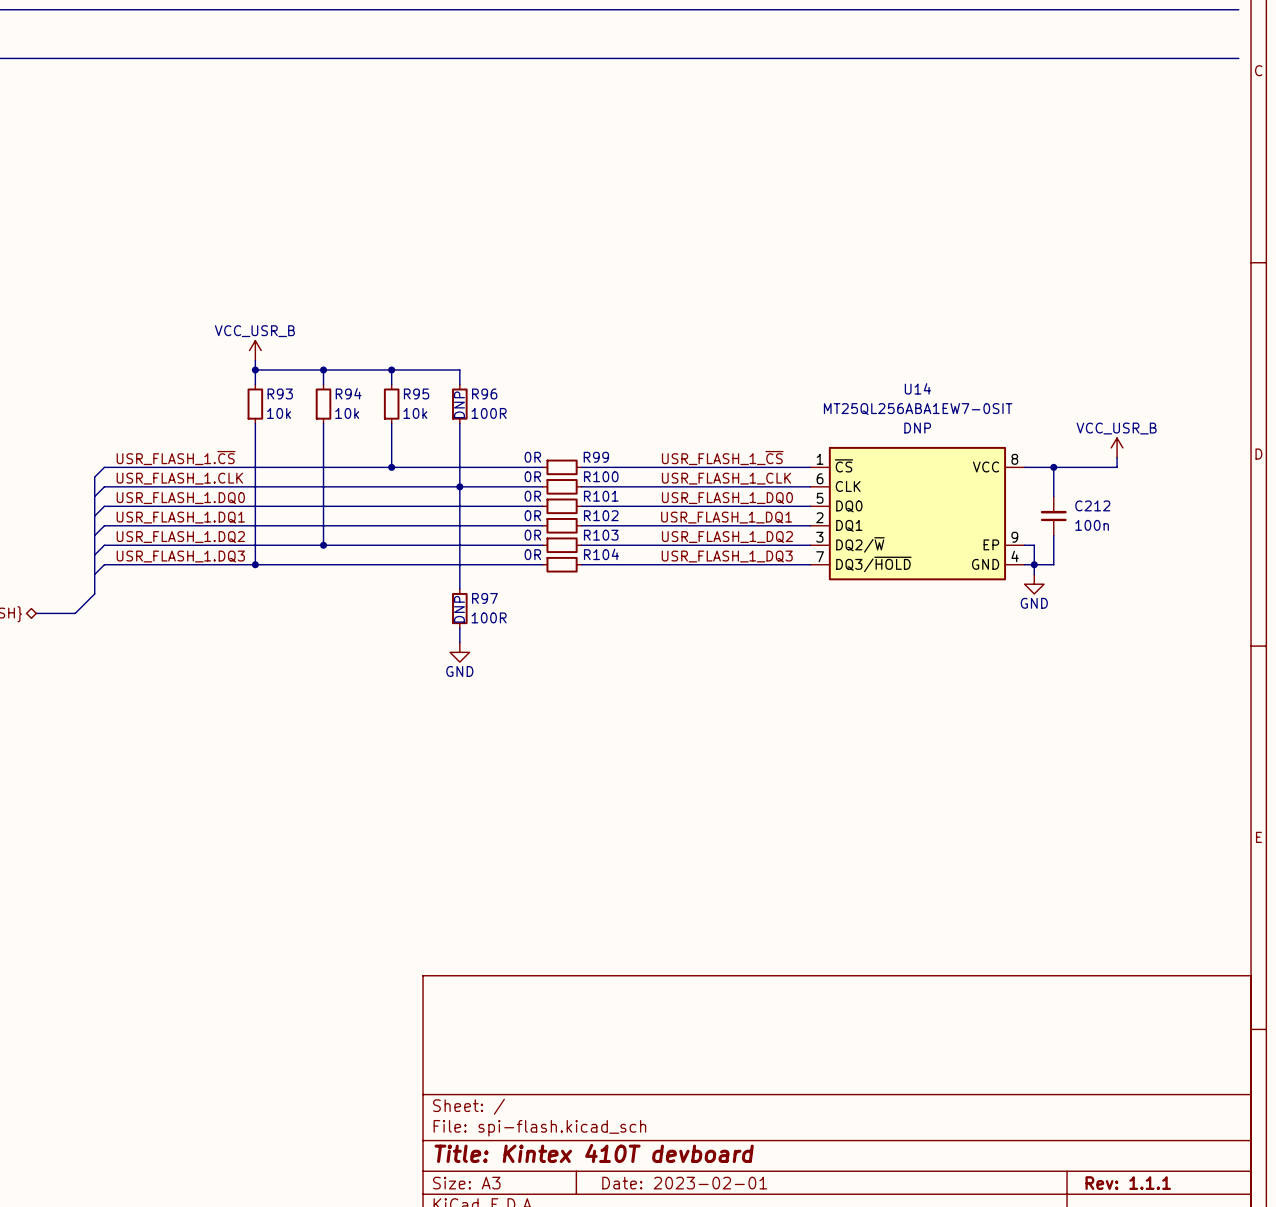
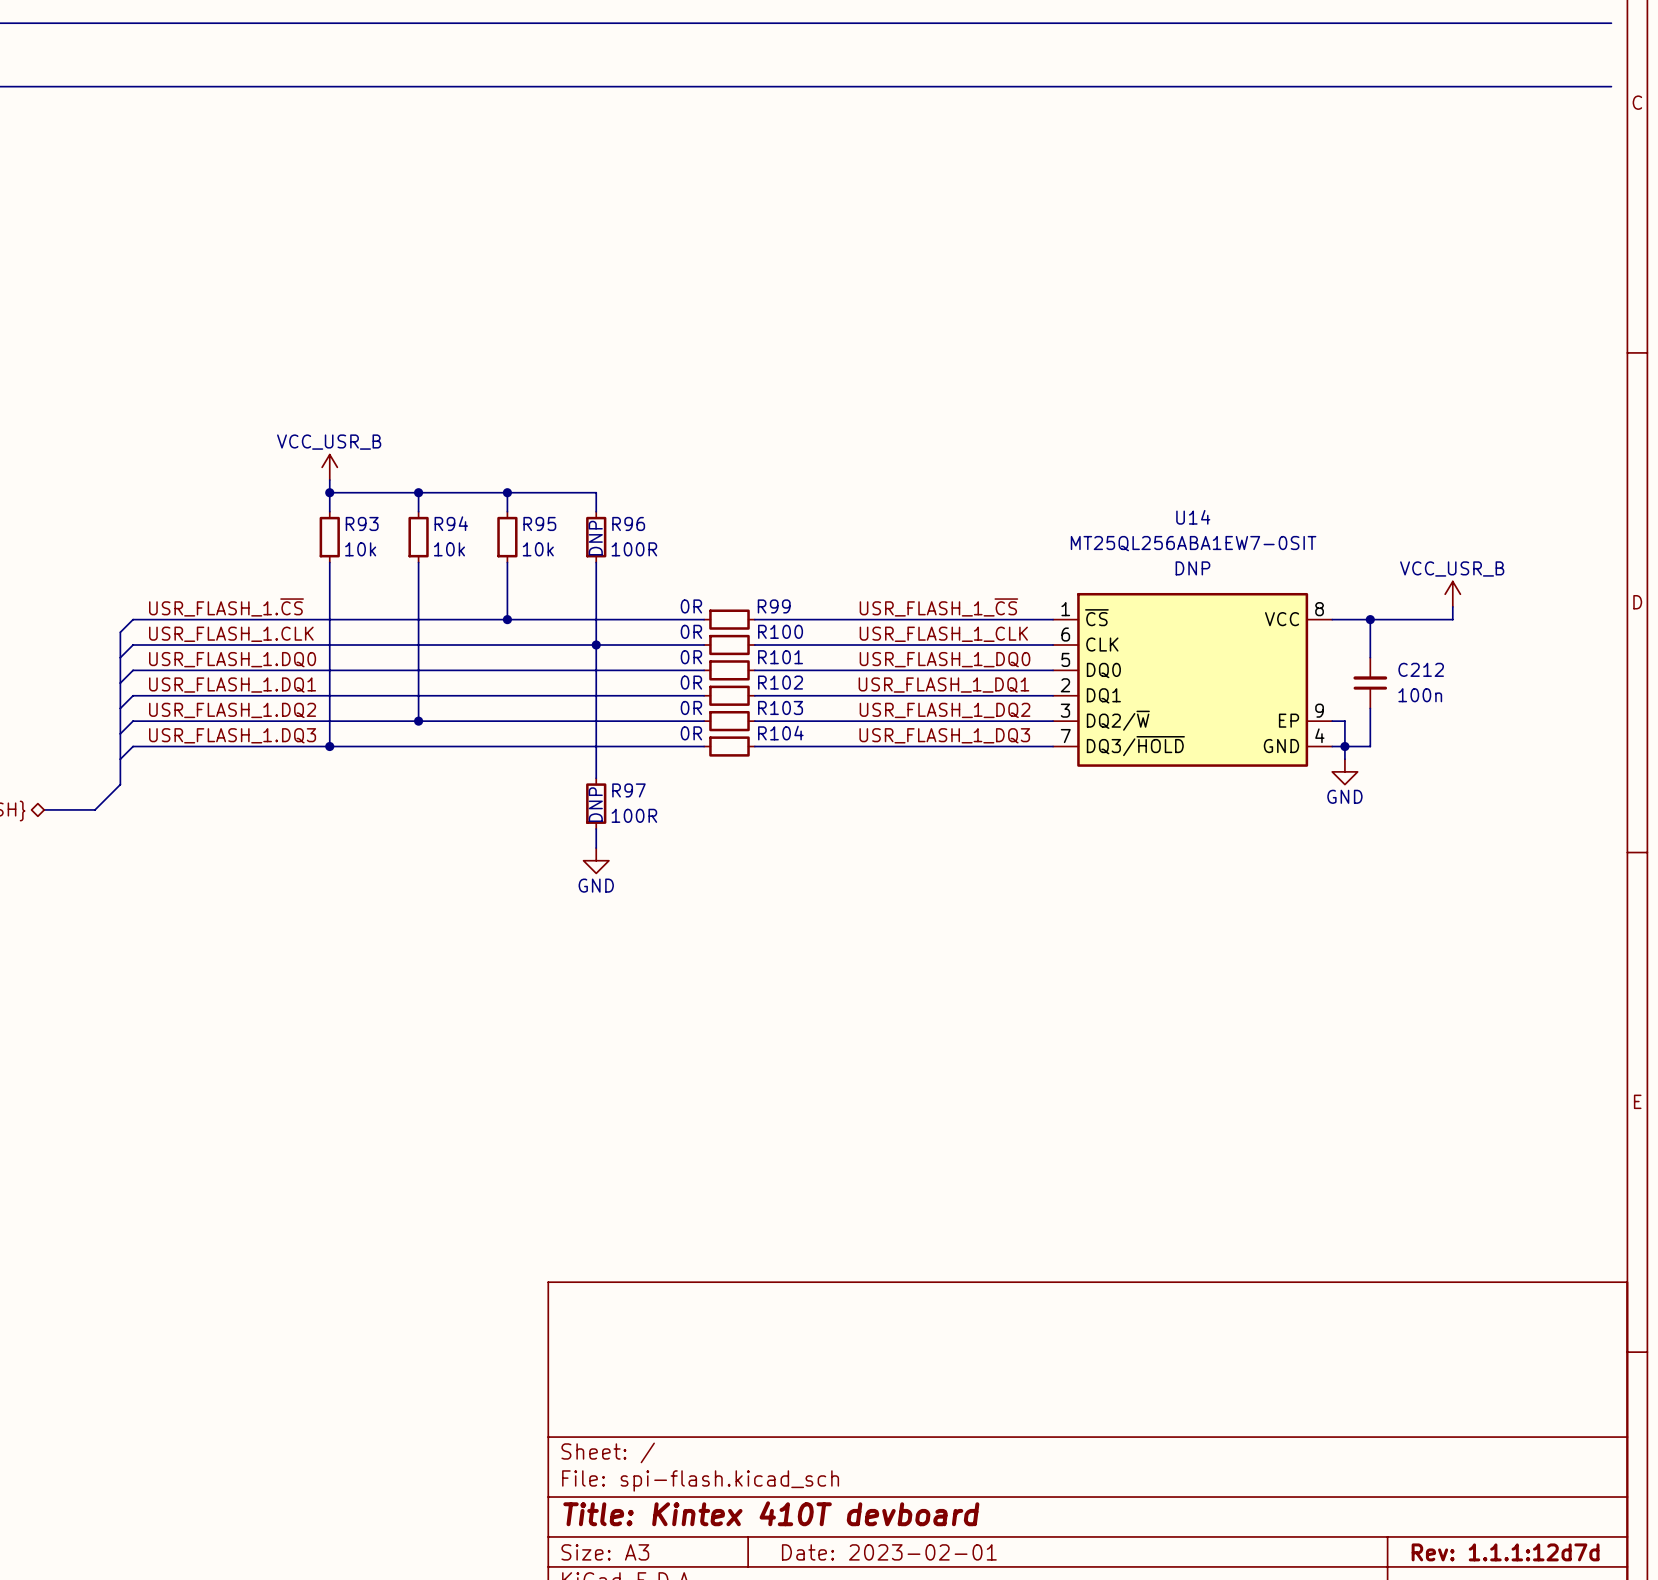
title block: Rev: 1.1.1 (1128, 1183) -> Rev: 1.1.1:12d7d (1505, 1552)

